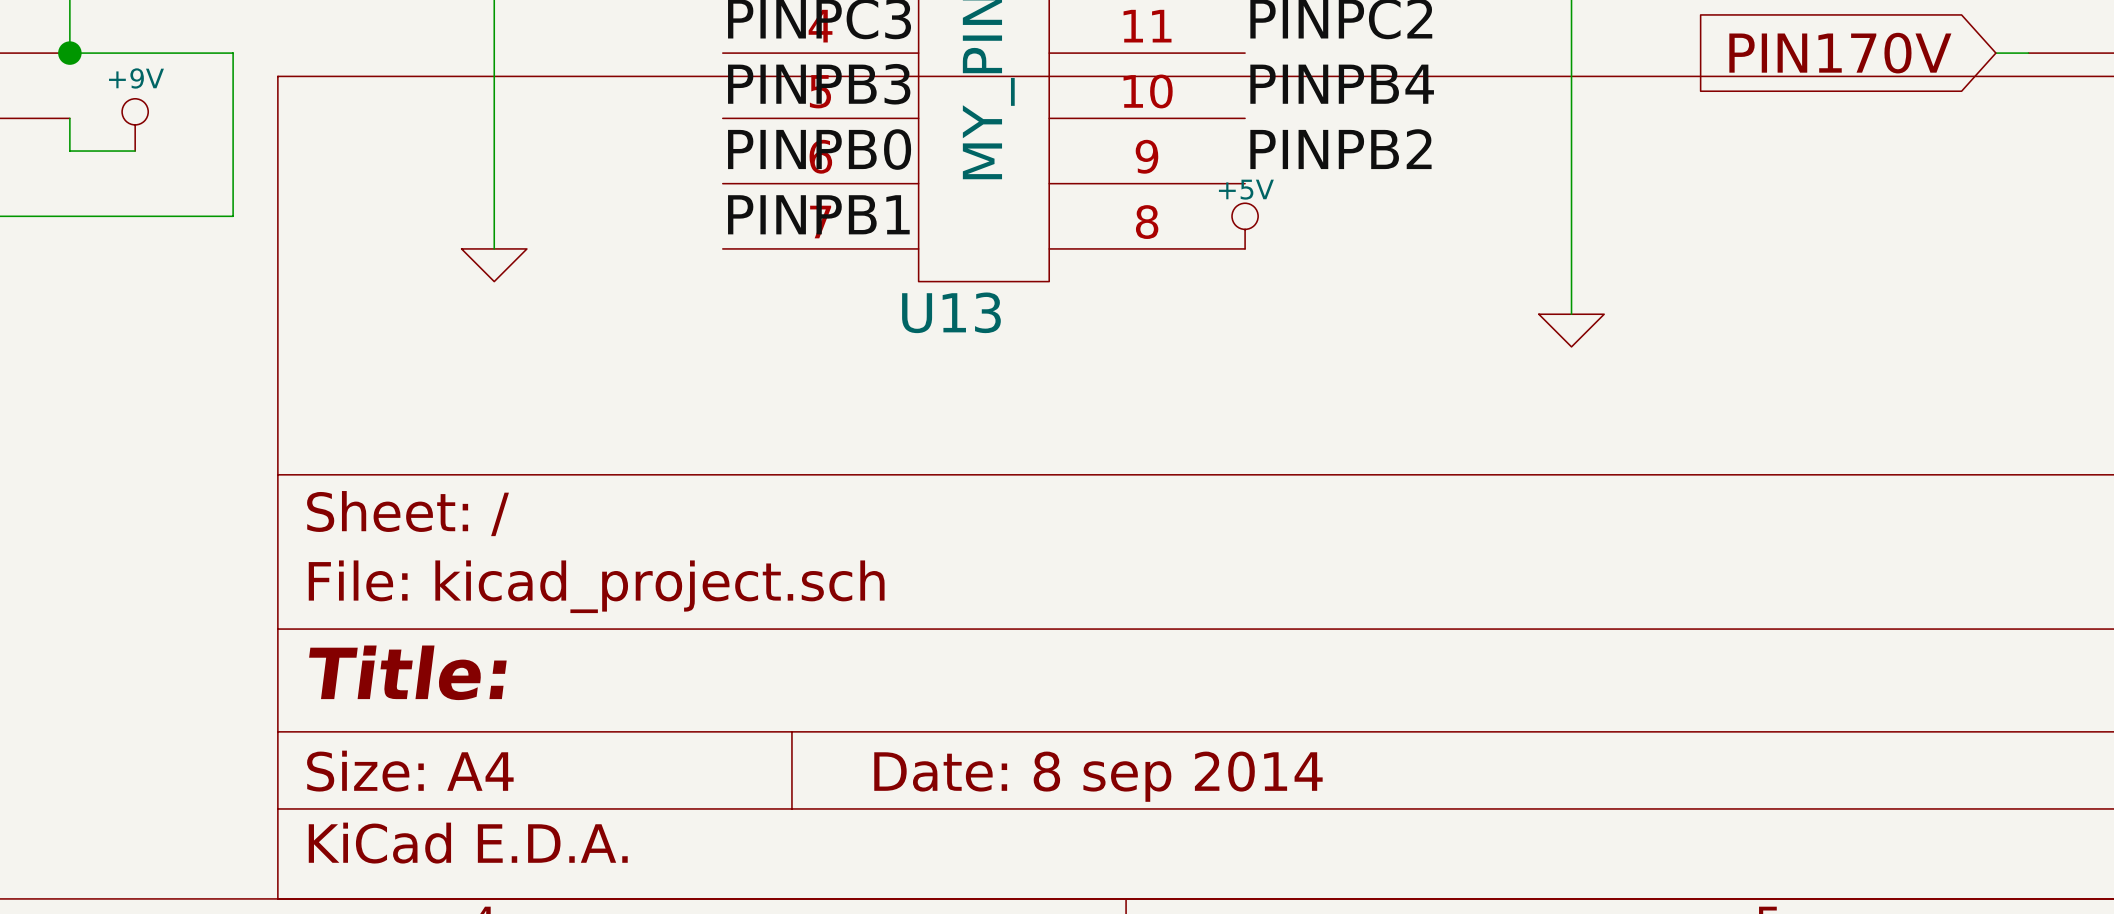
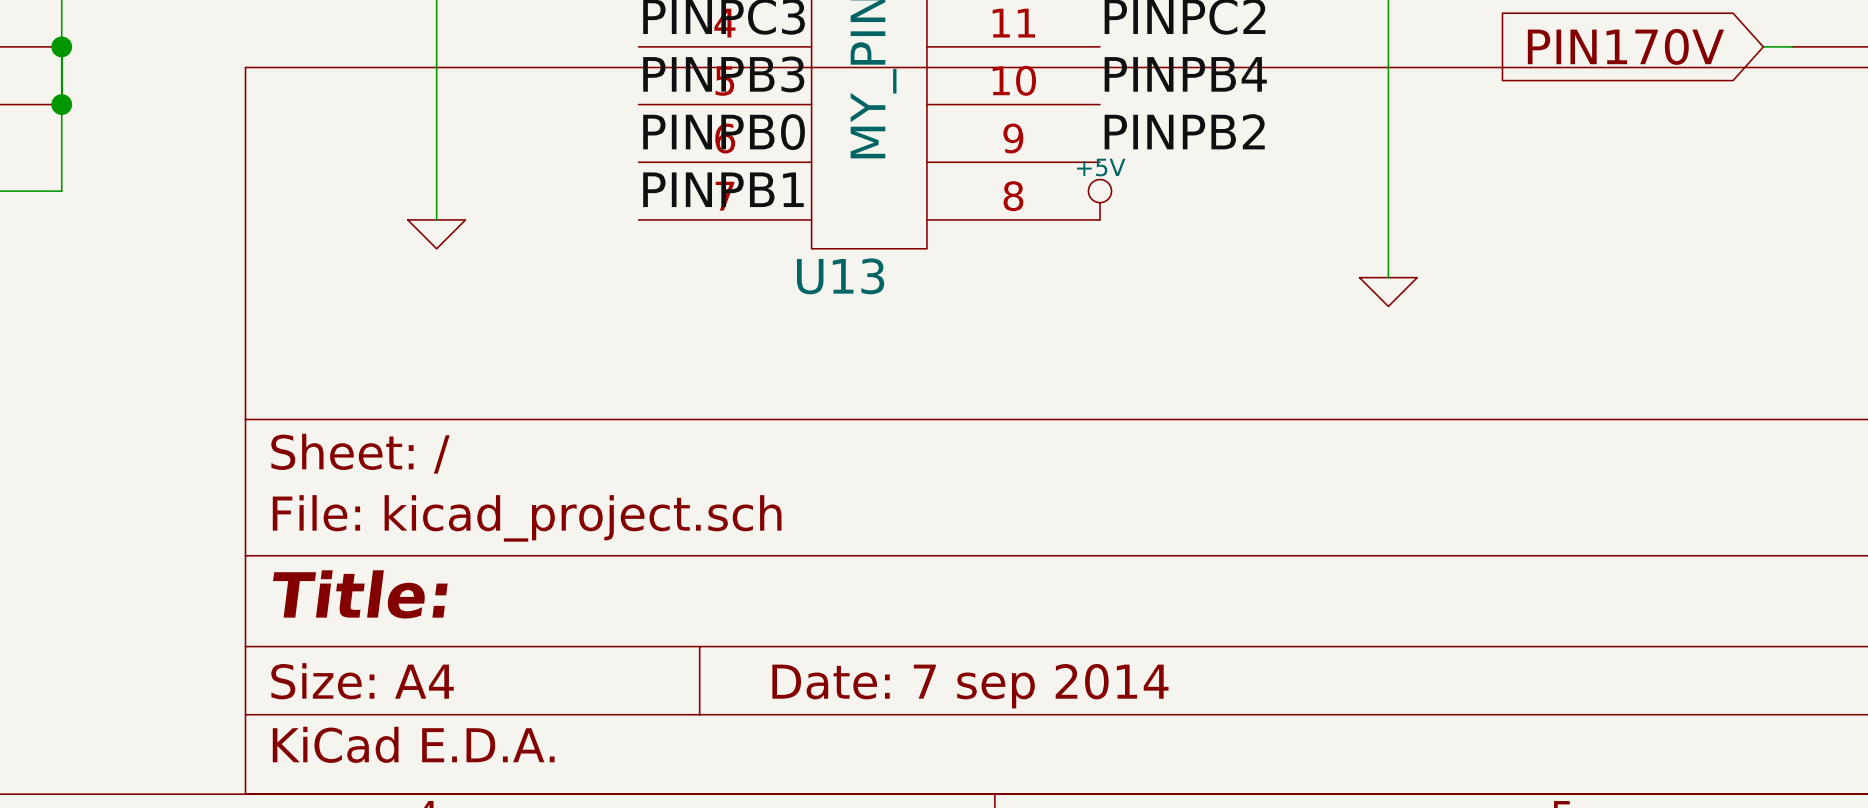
wire: (69, 53) (233, 53) (233, 216) (69, 216) -> (61, 46) (61, 104)
junction: none -> (61, 104)
power symbol: +9V (135, 124) -> none
wire: (69, 151) (135, 151) -> (61, 133) (61, 191)
title block: Date: 8 sep 2014 (1098, 776) -> Date: 7 sep 2014 (970, 686)

